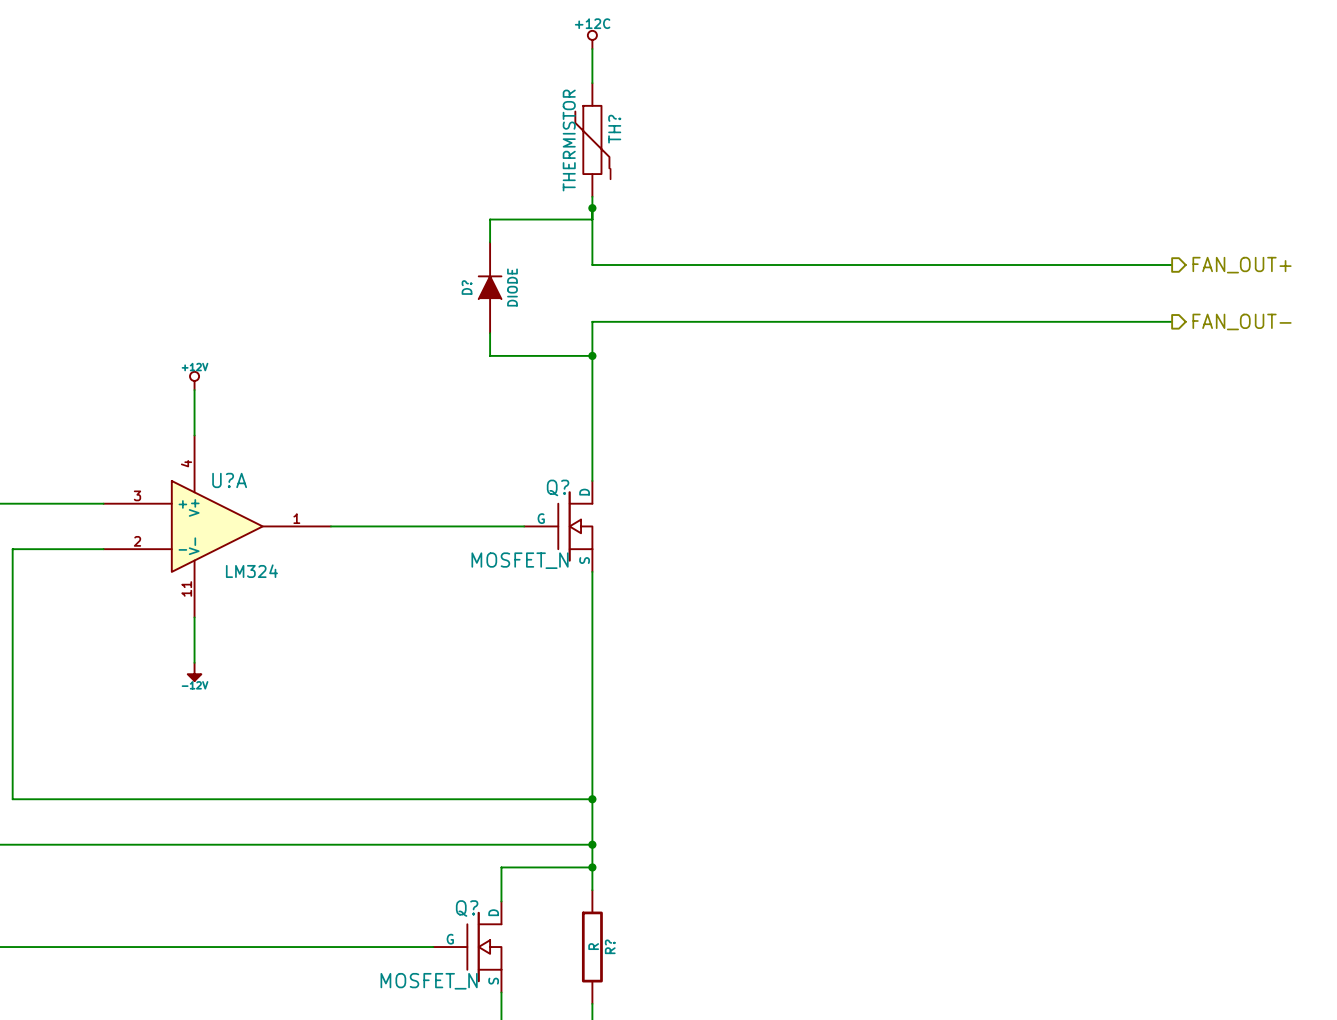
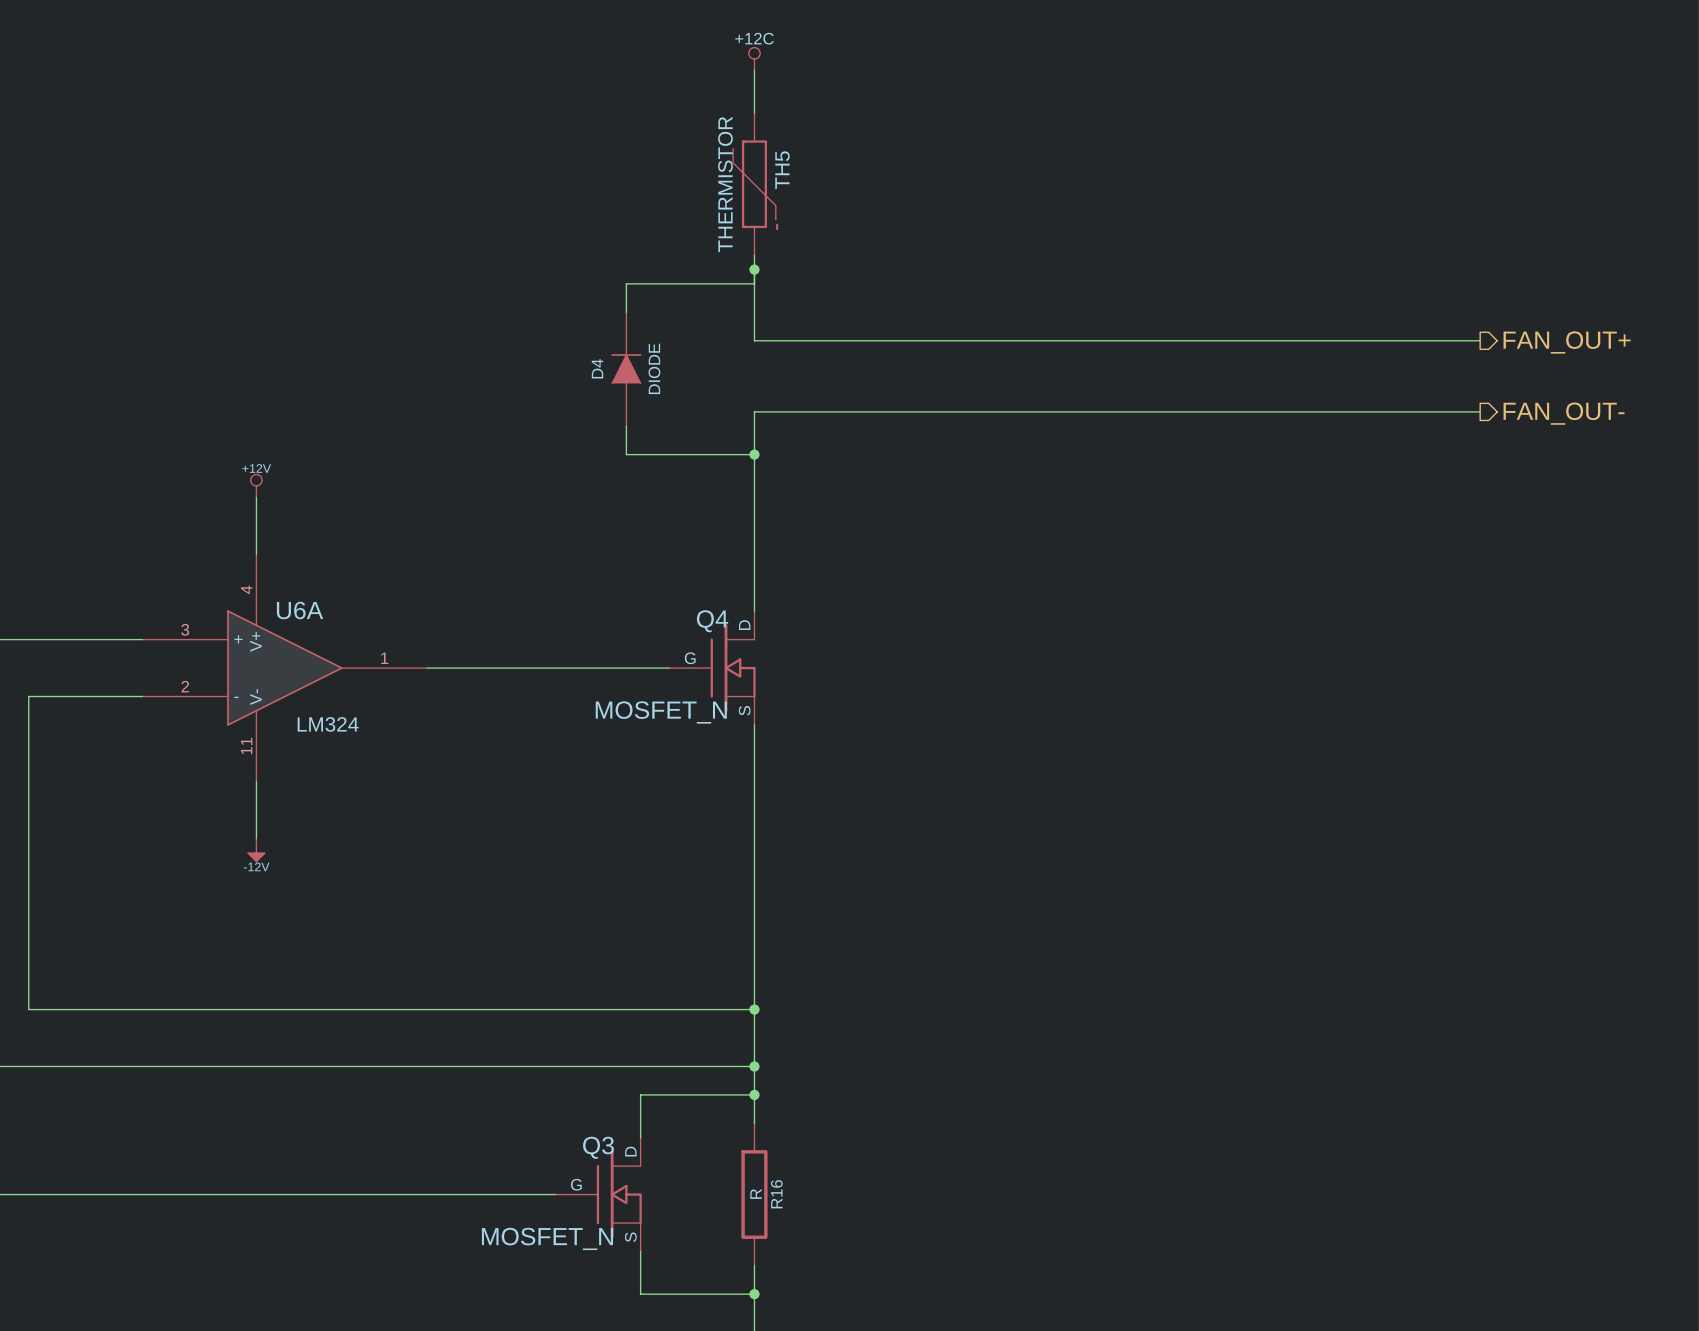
TH? name: TH? (614, 129) -> TH5 (782, 170)
D? name: D? (467, 287) -> D4 (597, 368)
U?A name: U?A (229, 480) -> U6A (300, 610)
Q? name: Q? (558, 487) -> Q4 (712, 621)
Q? name: Q? (467, 908) -> Q3 (598, 1147)
R? name: R? (610, 946) -> R16 (776, 1194)

